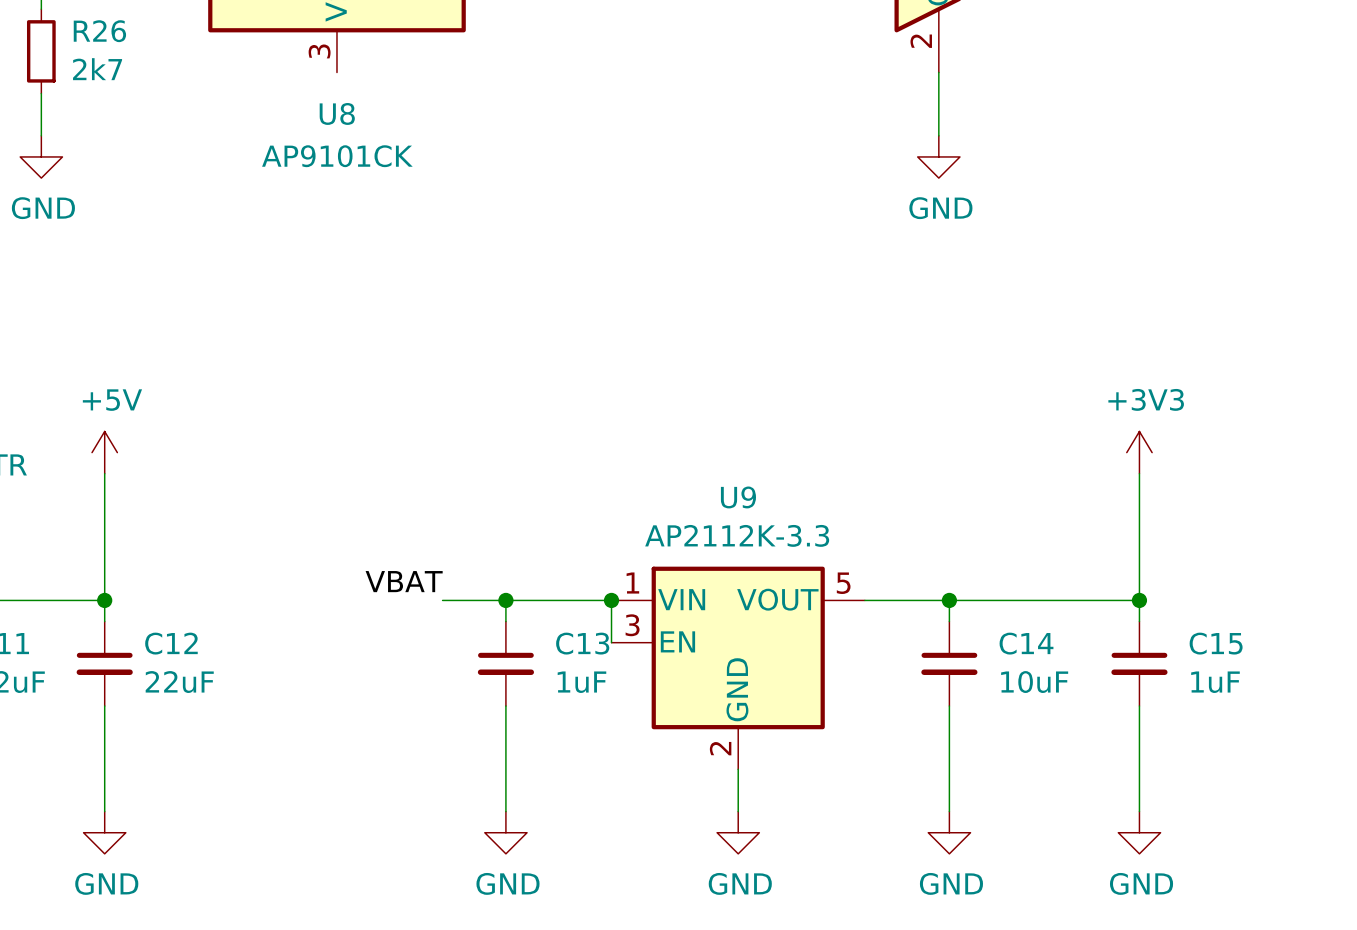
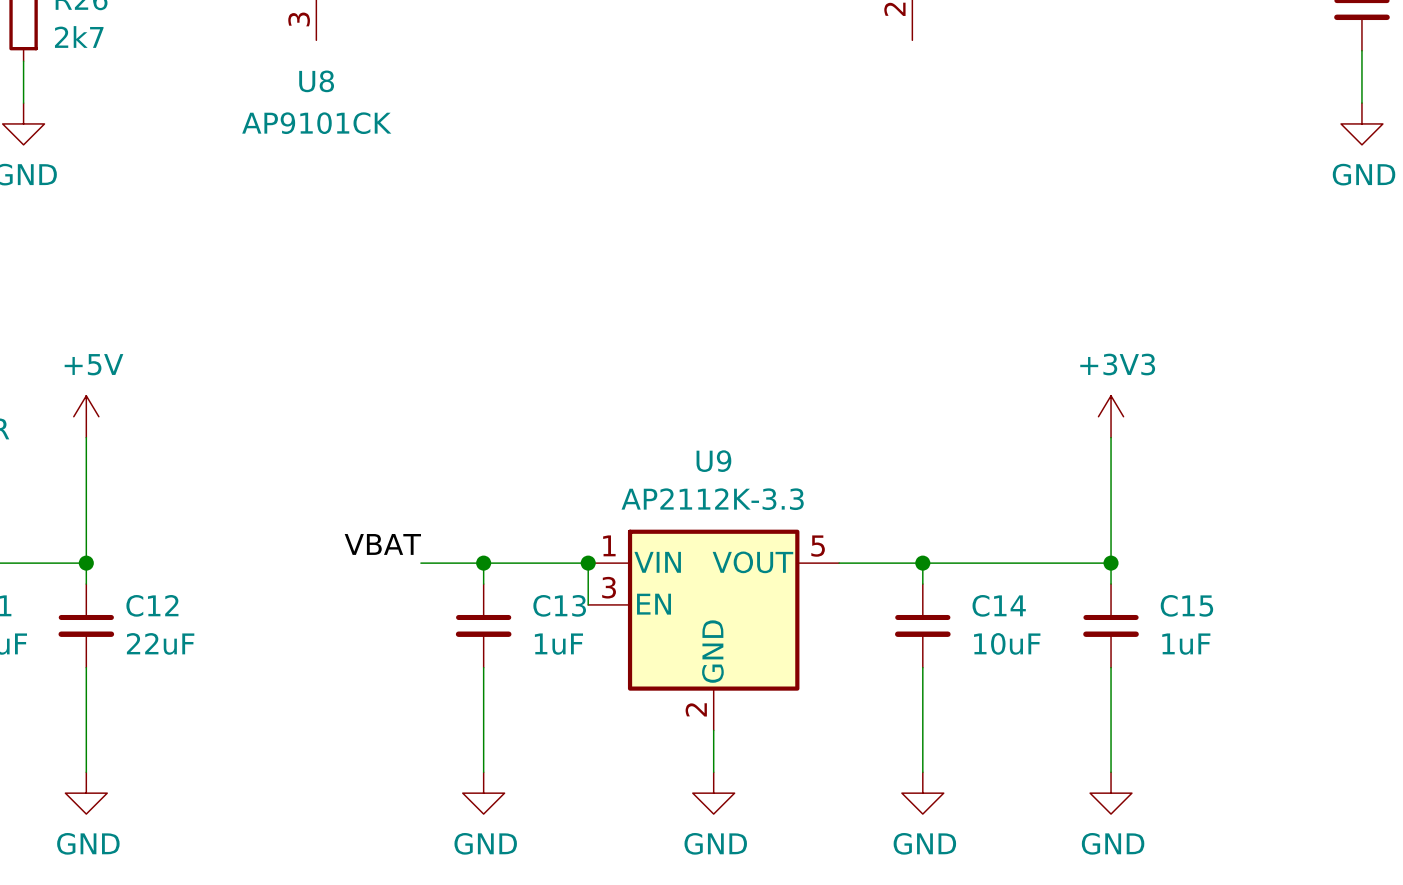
wire: (938, 72) (938, 135) -> none
power symbol: GND (938, 156) -> none

